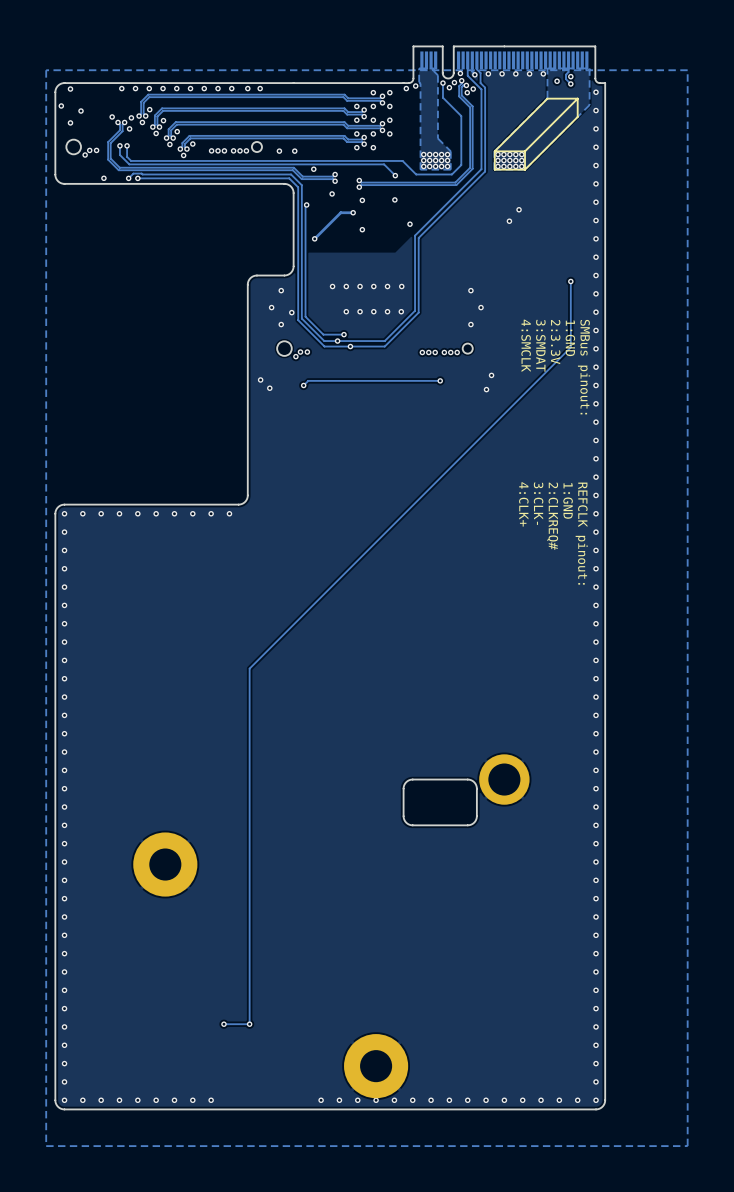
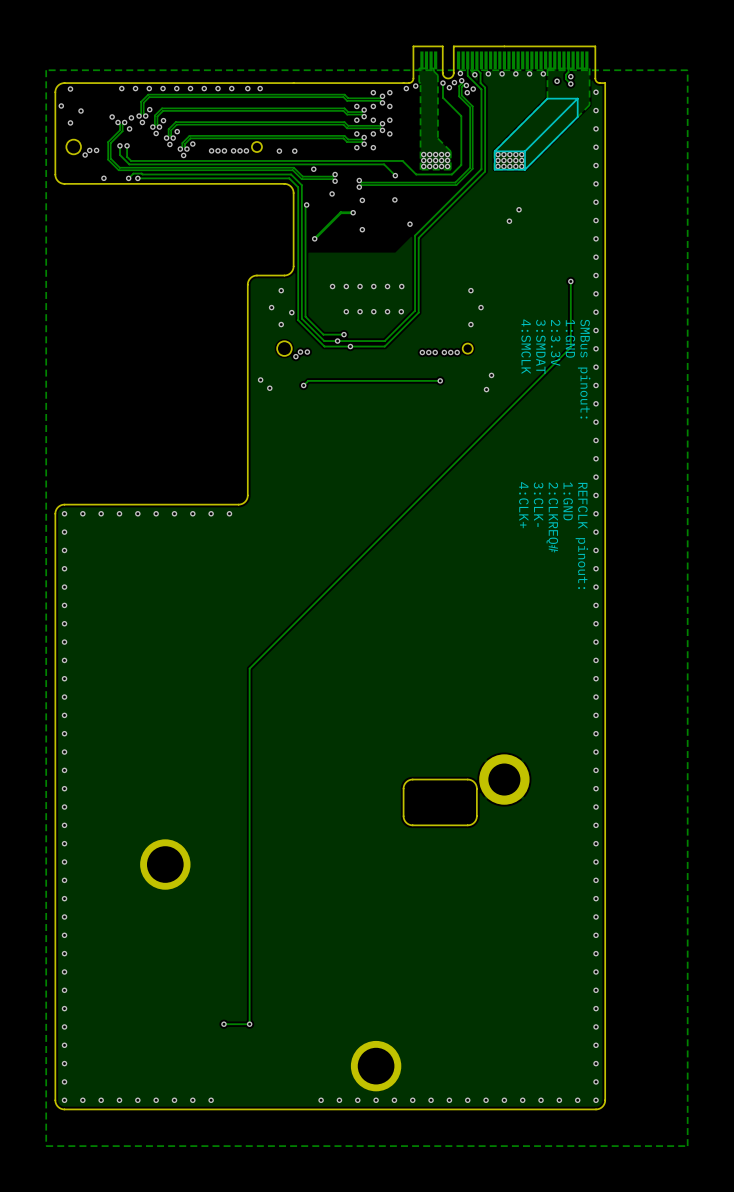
part footprint: [133, 832, 198, 897] -> [140, 839, 191, 890]
part footprint: [344, 1034, 409, 1099] -> [350, 1040, 402, 1092]

